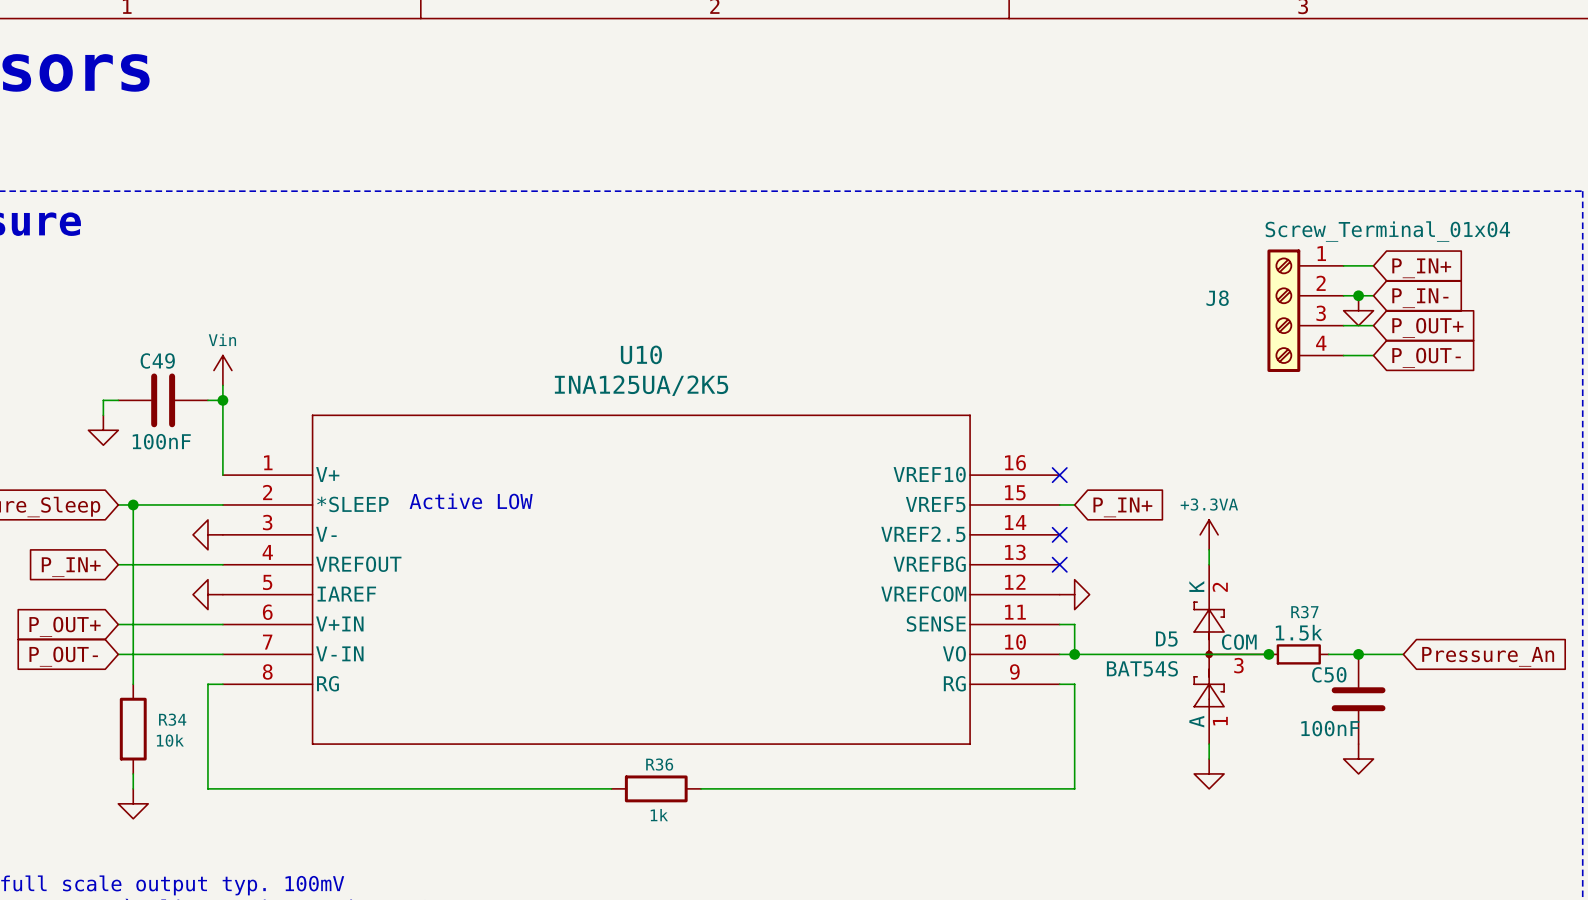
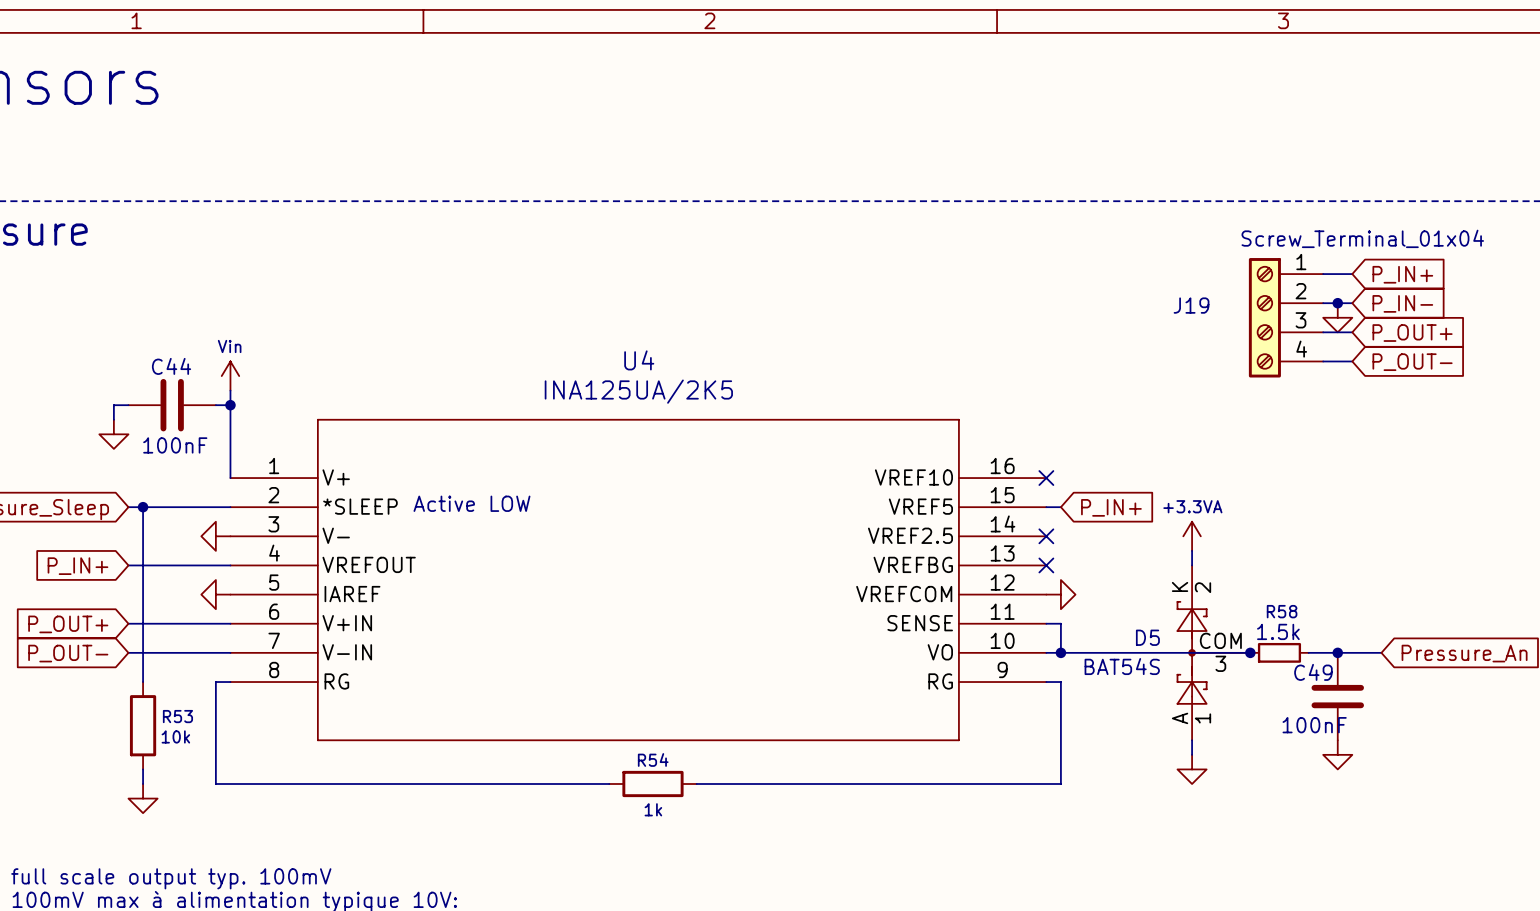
J8 name: J8 (1217, 298) -> J19 (1191, 305)
U10 name: U10 (641, 354) -> U4 (639, 360)
C49 name: C49 (157, 360) -> C44 (171, 366)
R37 name: R37 (1304, 612) -> R58 (1282, 611)
C50 name: C50 (1329, 674) -> C49 (1313, 672)
R34 name: R34 (172, 719) -> R53 (177, 716)
R36 name: R36 (659, 764) -> R54 (653, 759)

